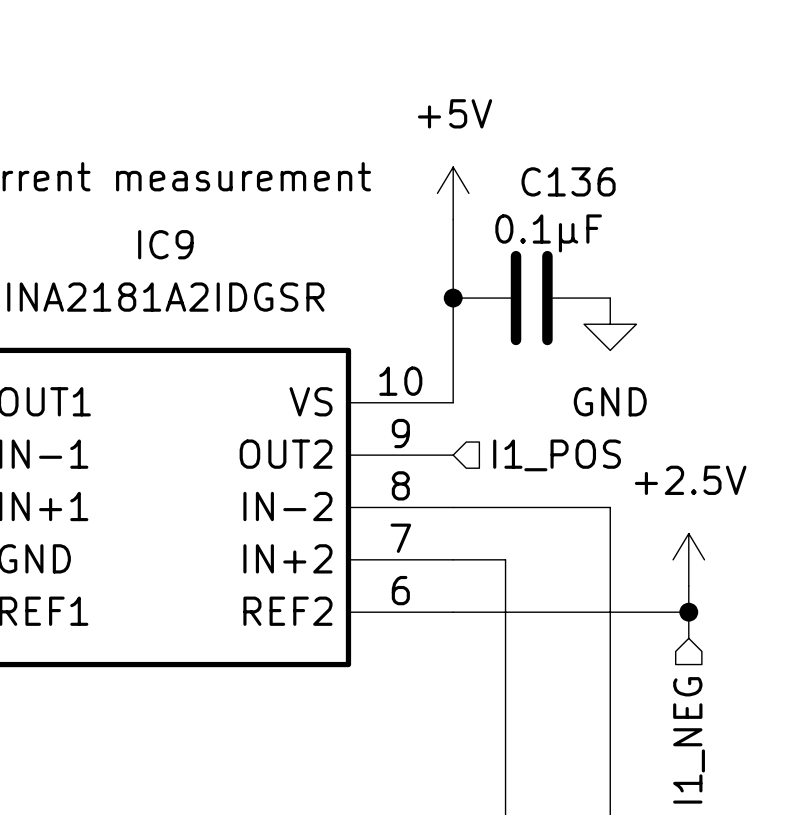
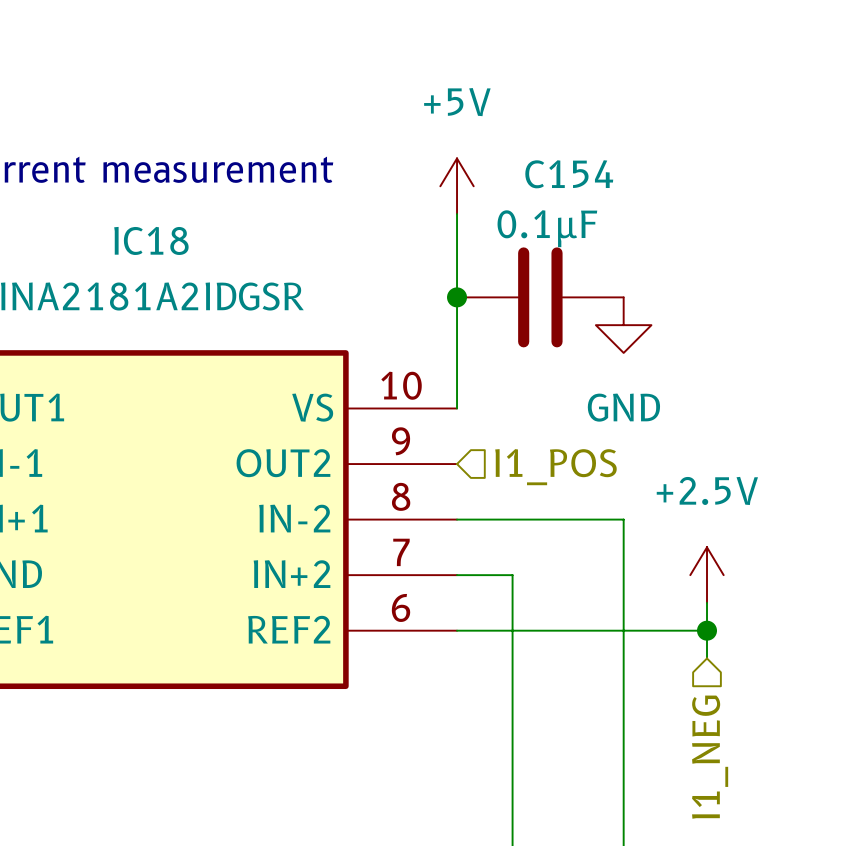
C136 name: C136 (568, 181) -> C154 (569, 174)
IC9 name: IC9 (165, 244) -> IC18 (151, 240)

